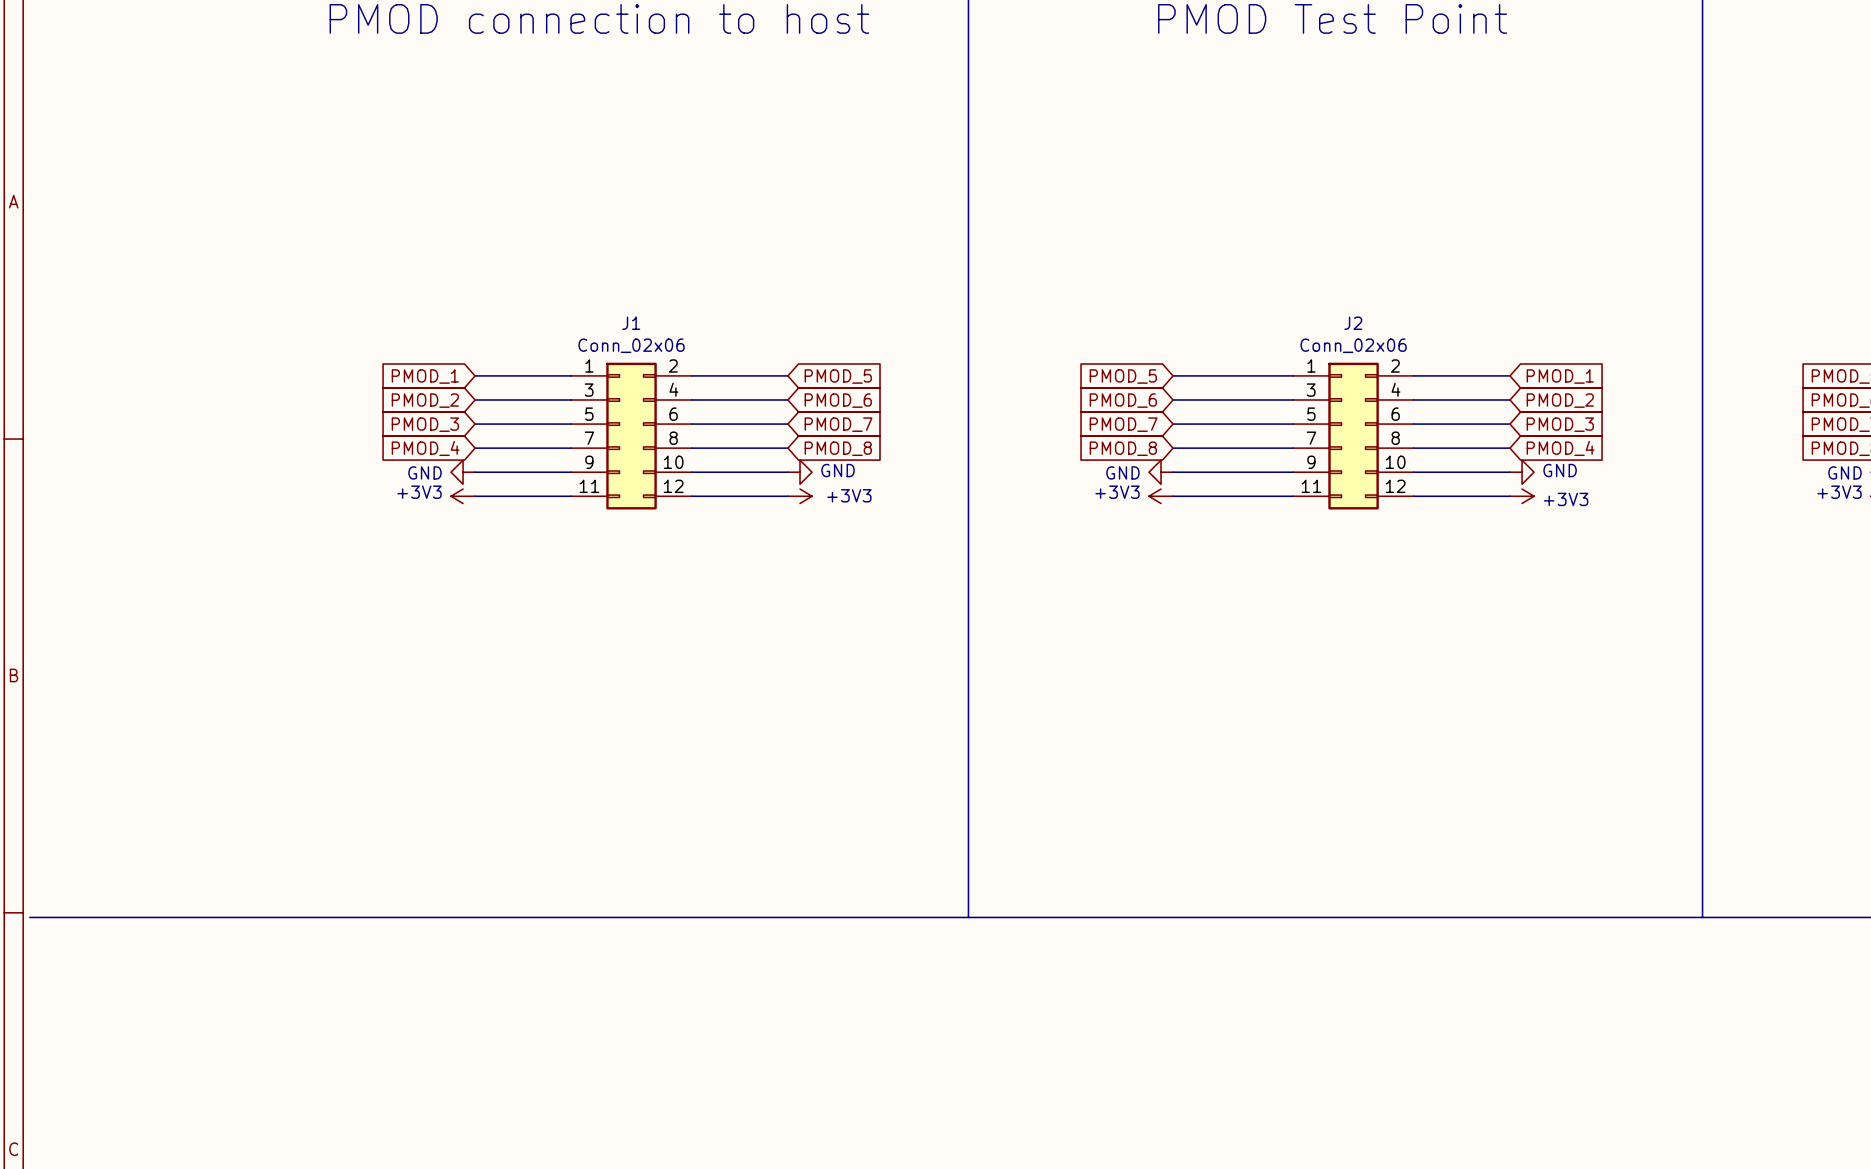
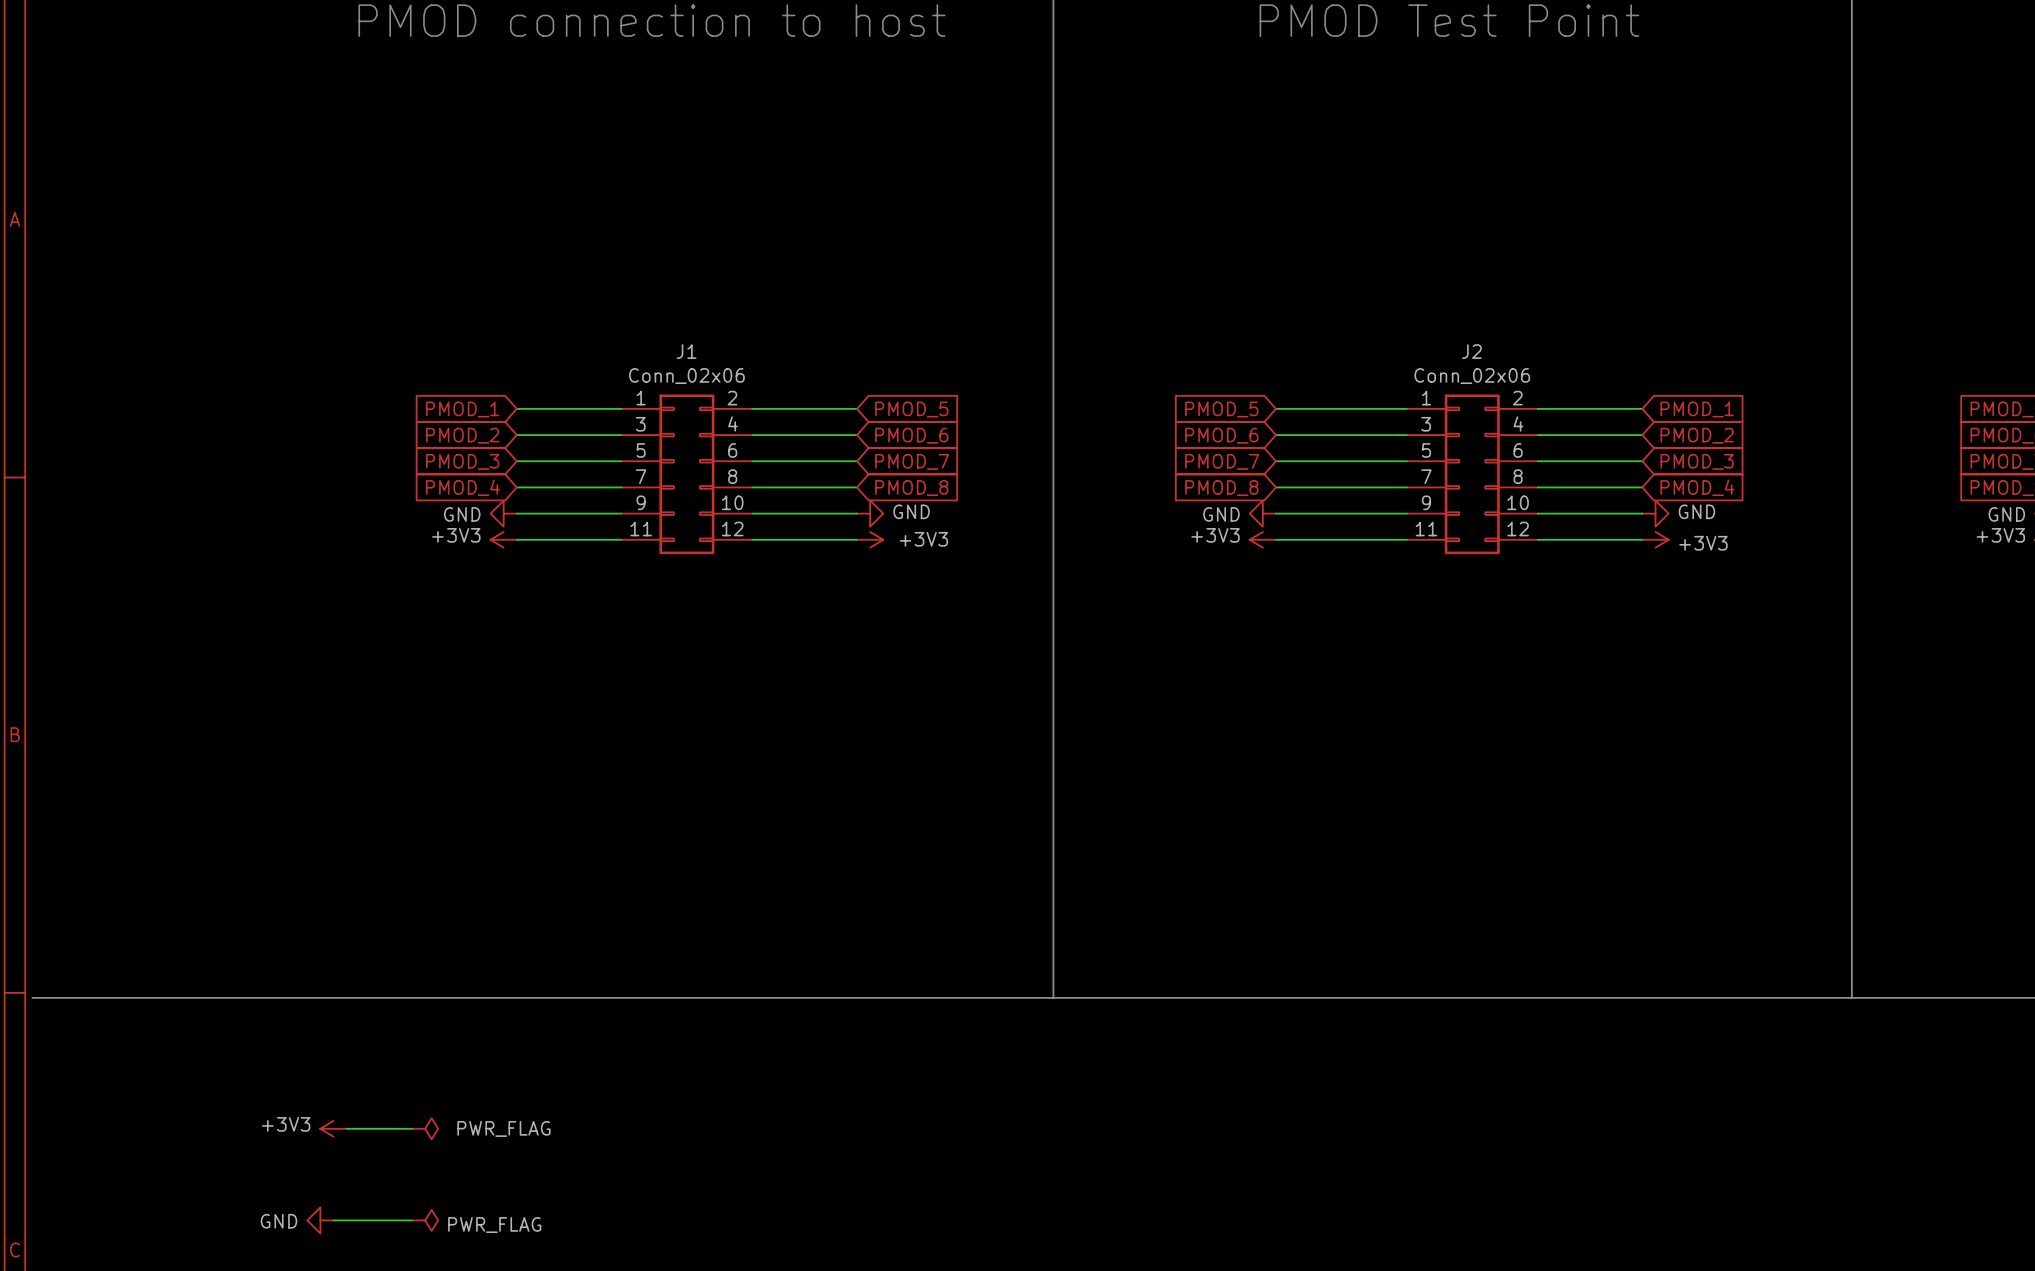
power symbol: none -> +3V3 (333, 1128)
wire: none -> (346, 1128) (412, 1128)
power symbol: none -> PWR_FLAG (425, 1128)
power symbol: none -> GND (320, 1220)
wire: none -> (333, 1220) (412, 1220)
power symbol: none -> PWR_FLAG (425, 1220)

